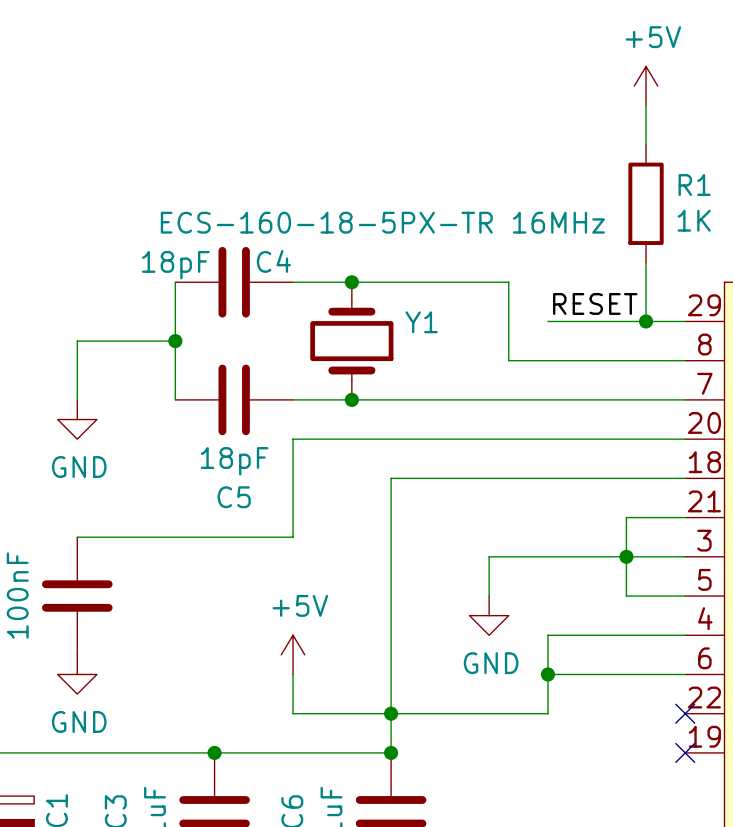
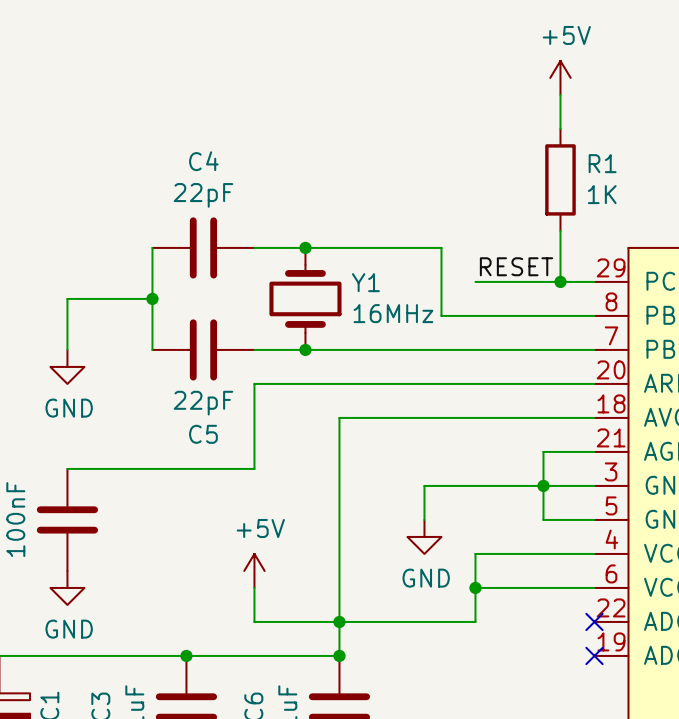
Y1 value: ECS-160-18-5PX-TR 16MHz (382, 222) -> 16MHz (393, 313)
C4 name position: C4 (273, 261) -> C4 (203, 161)
C4 value: 18pF (175, 265) -> 22pF (203, 195)
C5 value: 18pF (234, 461) -> 22pF (203, 403)

